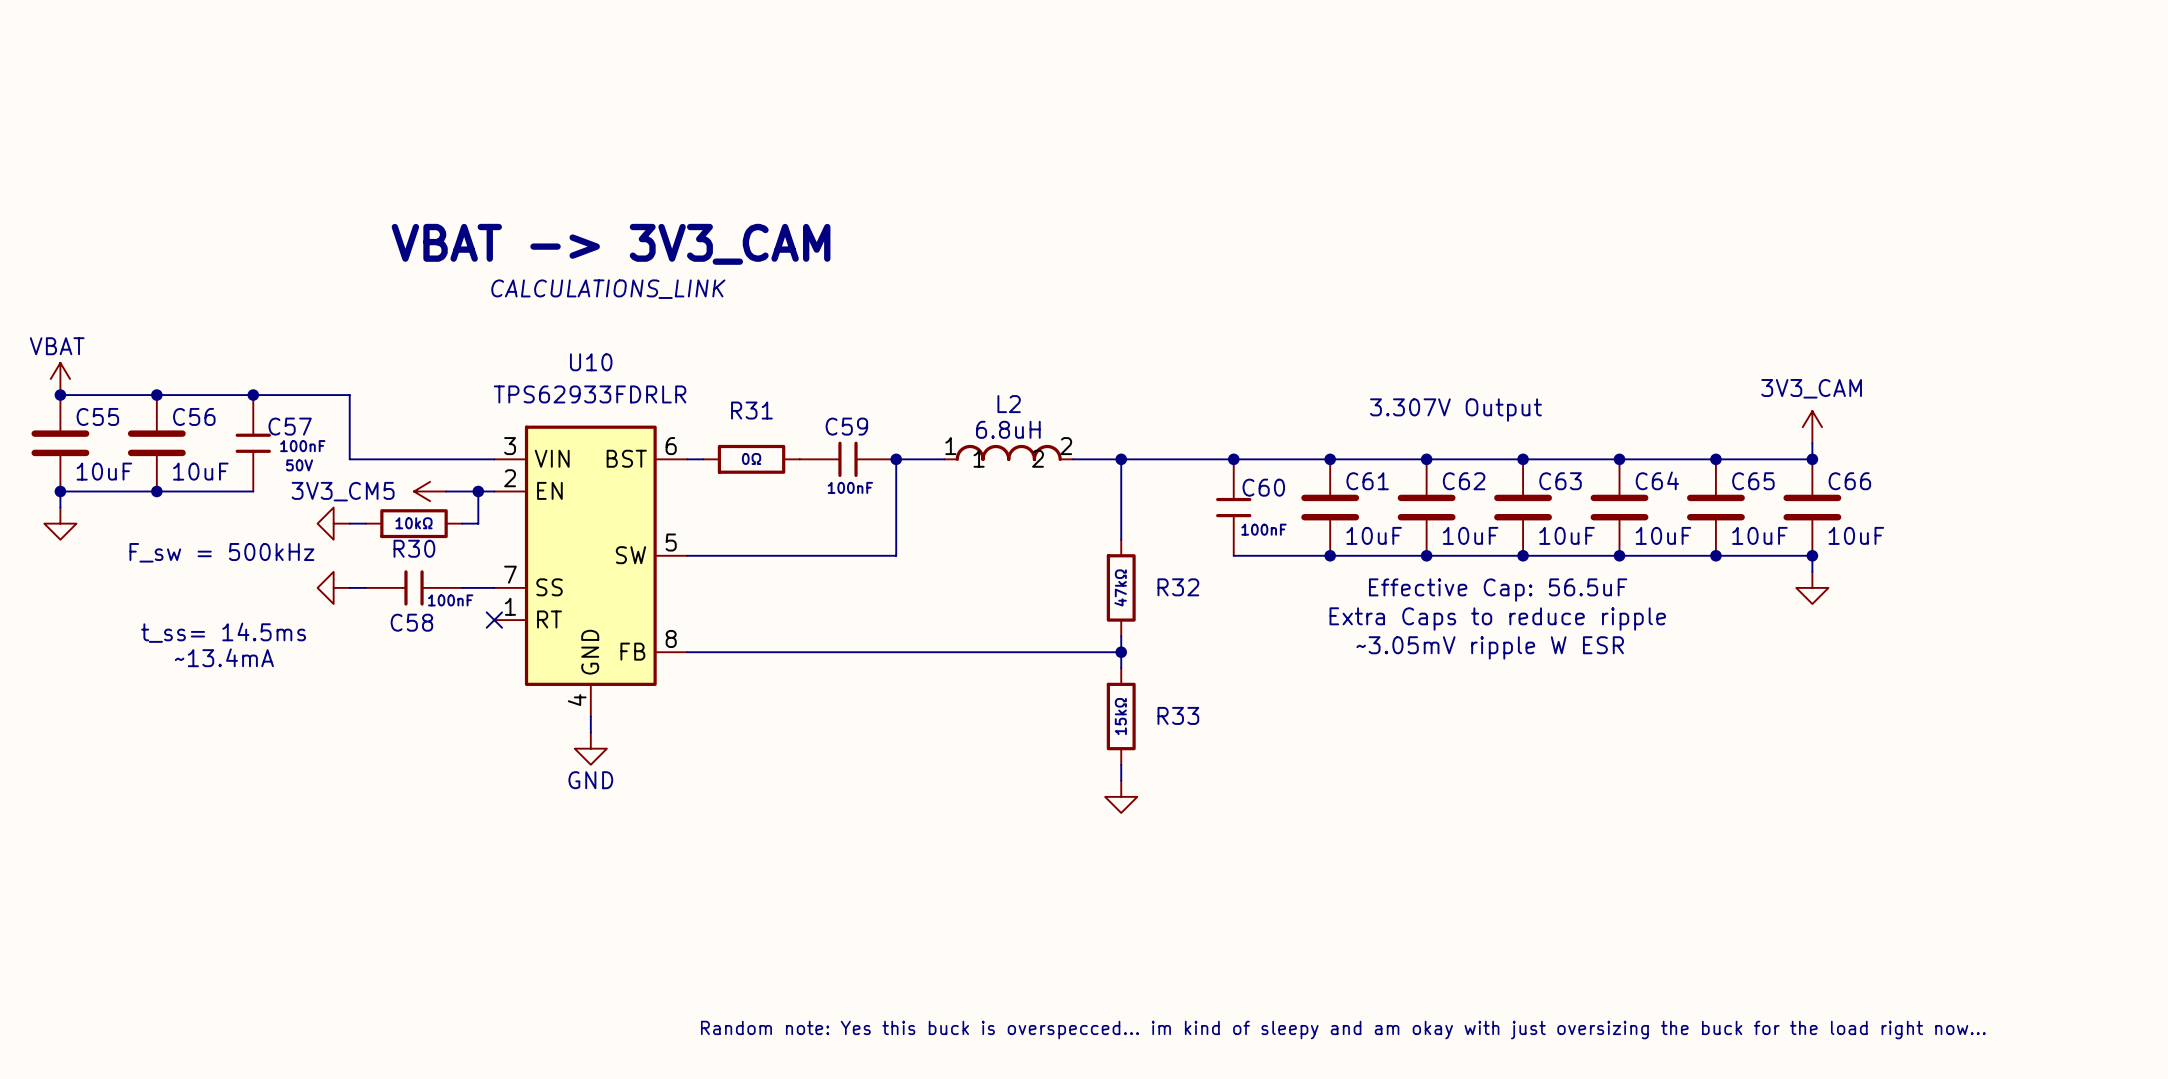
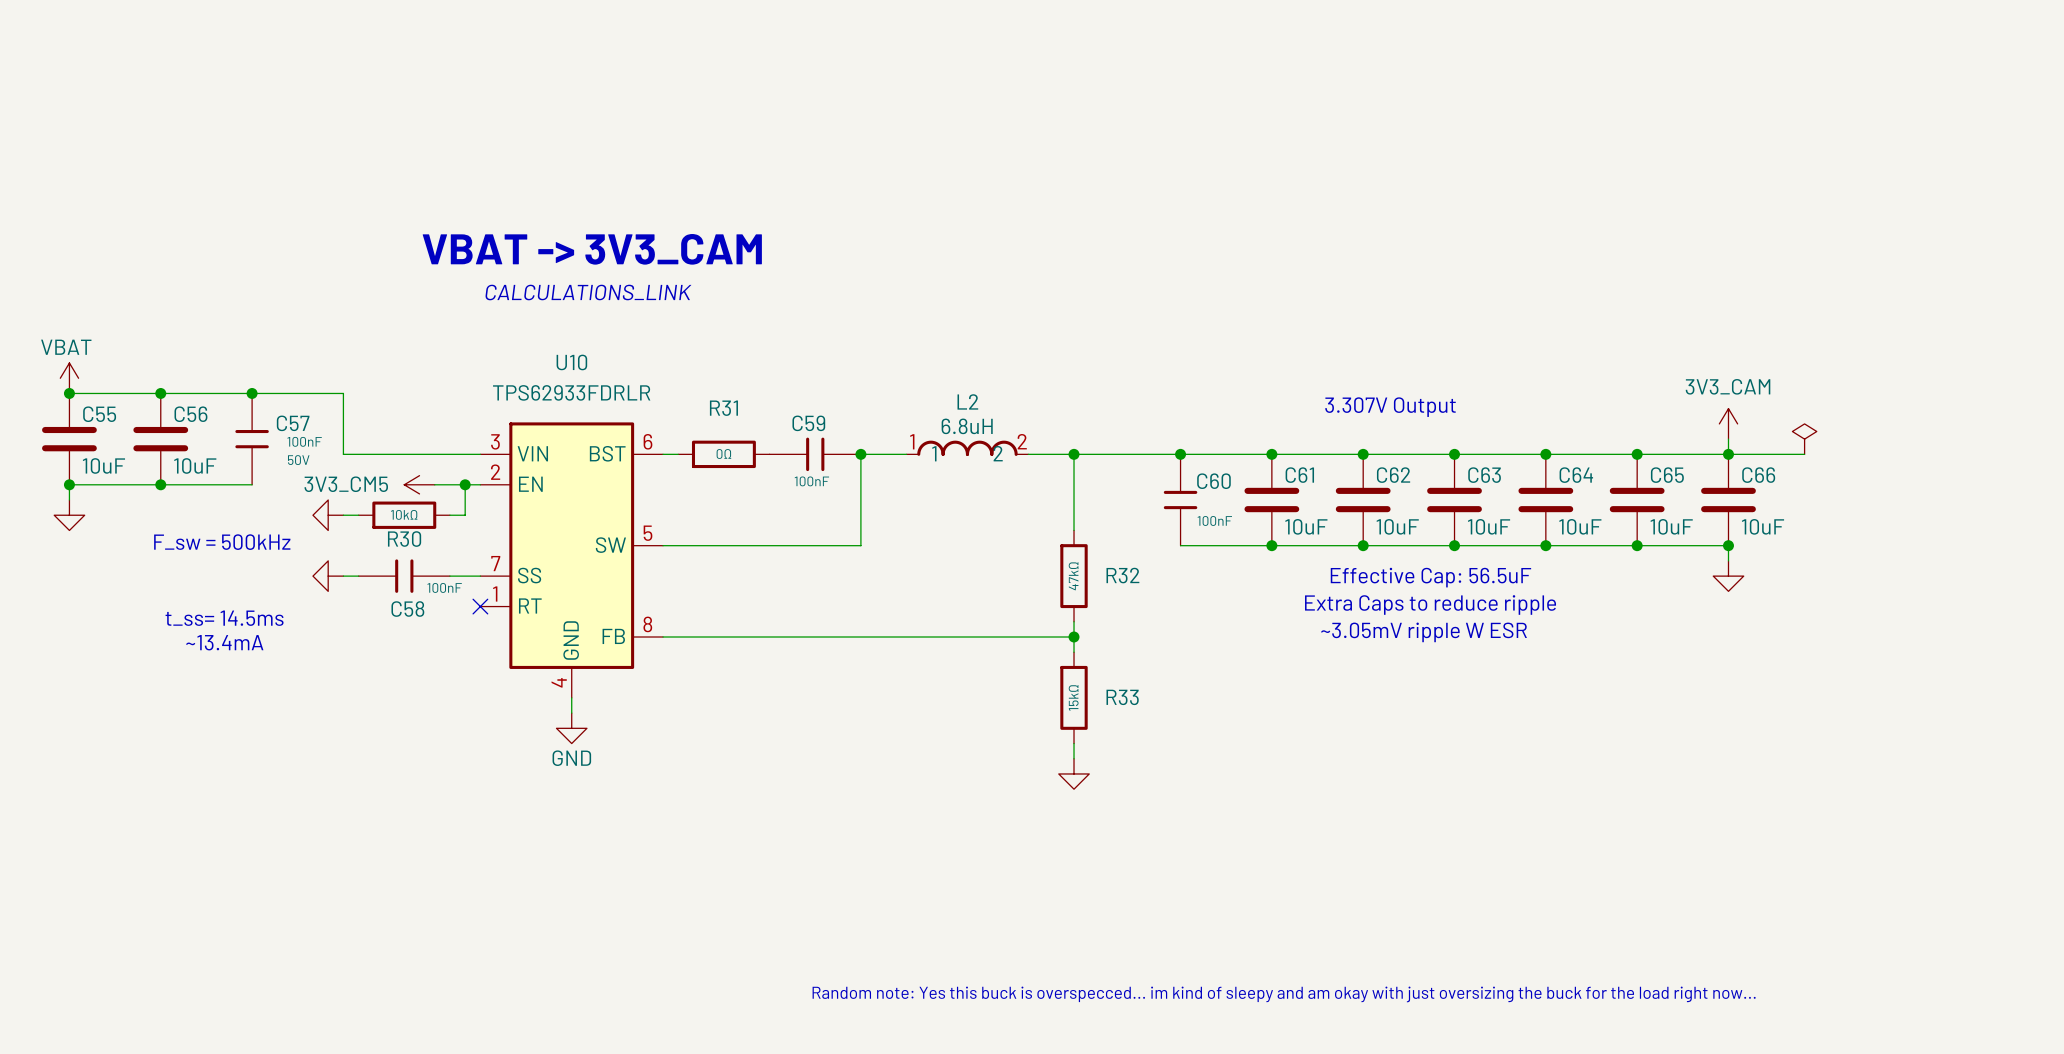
power symbol: none -> (1804, 439)
wire: none -> (1728, 454) (1804, 454)

